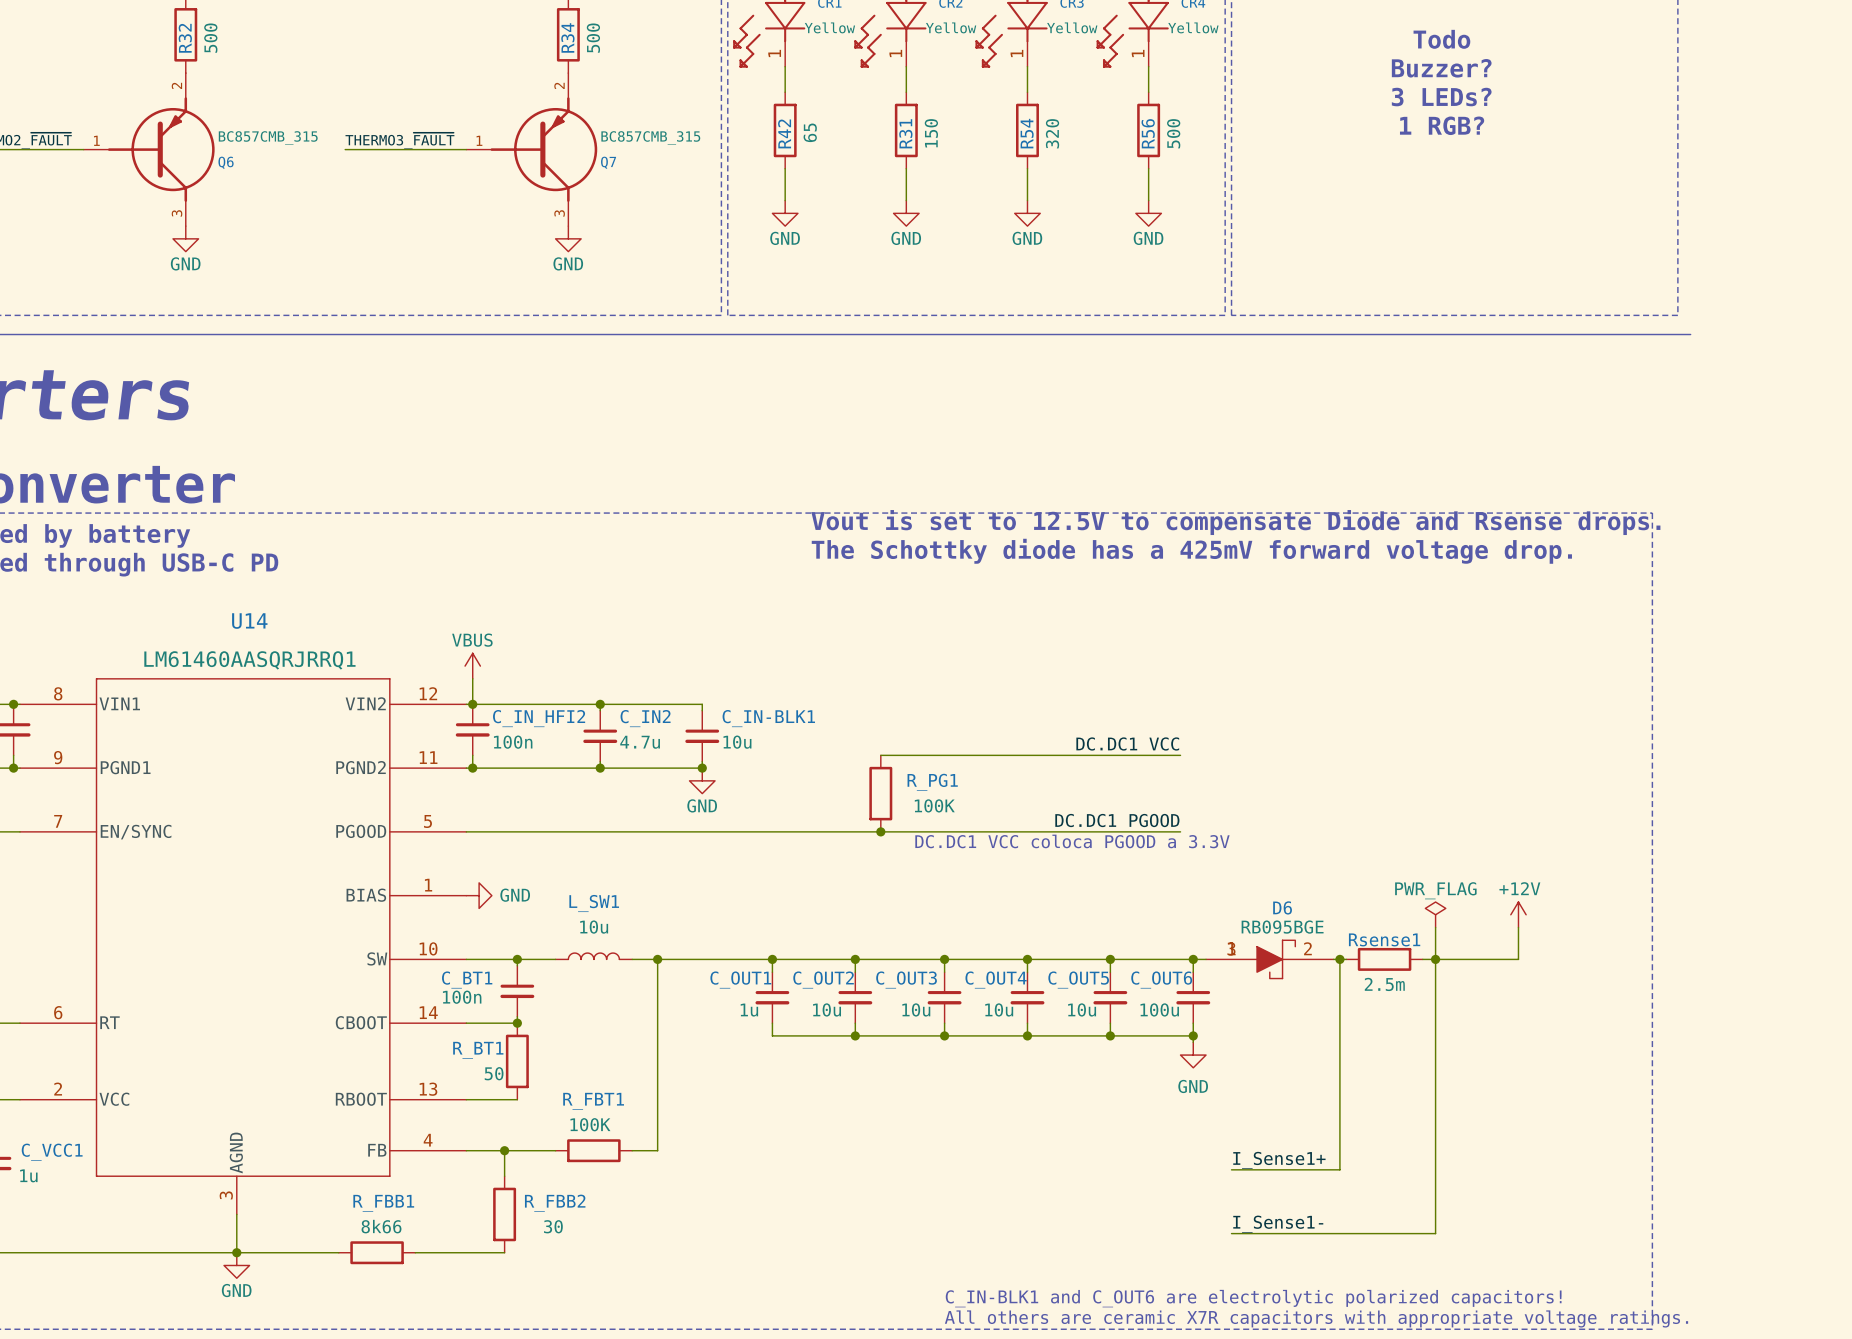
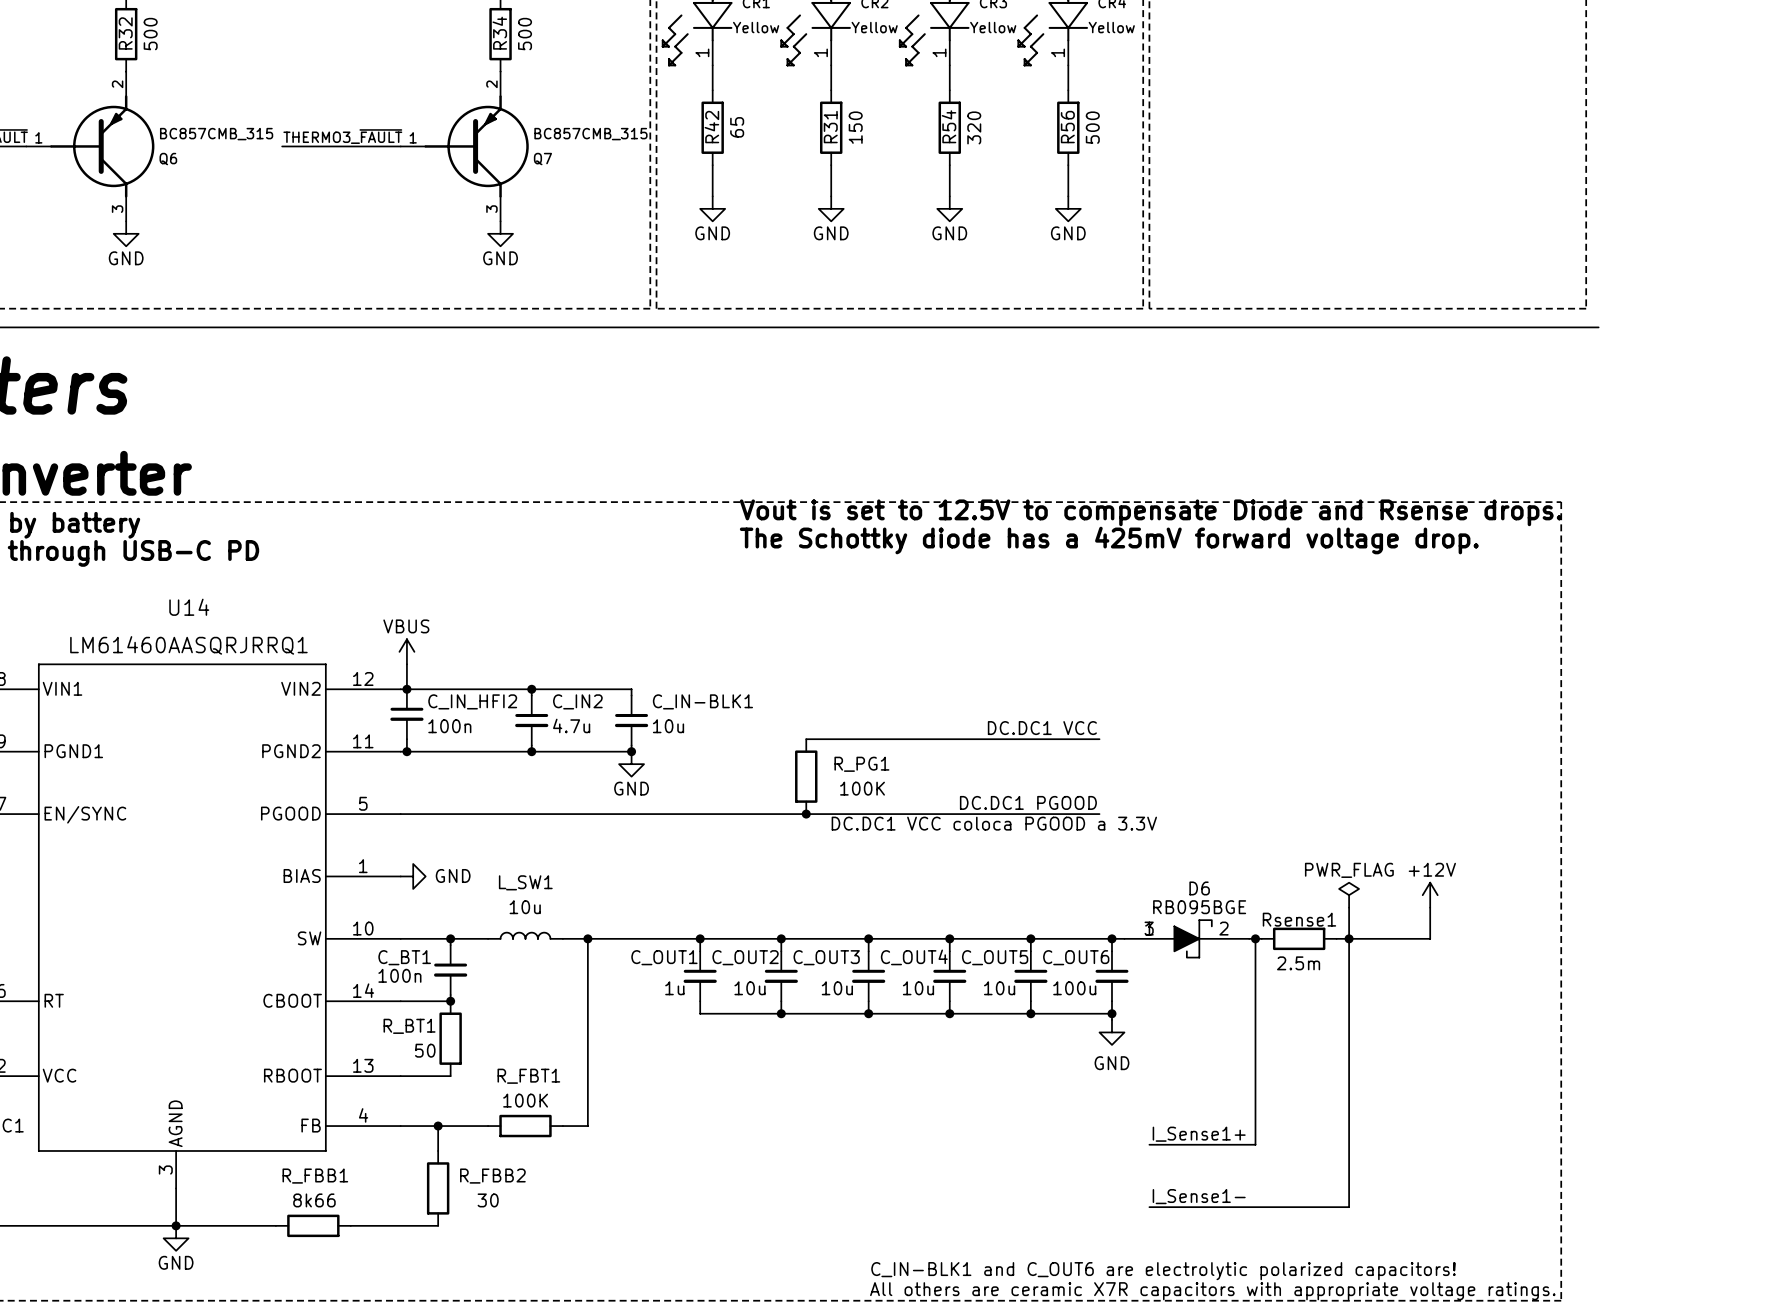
text: Todo (1441, 39) -> none
text: Buzzer? (1441, 68) -> none
text: 3 LEDs? (1441, 97) -> none
text: 1 RGB? (1442, 125) -> none

